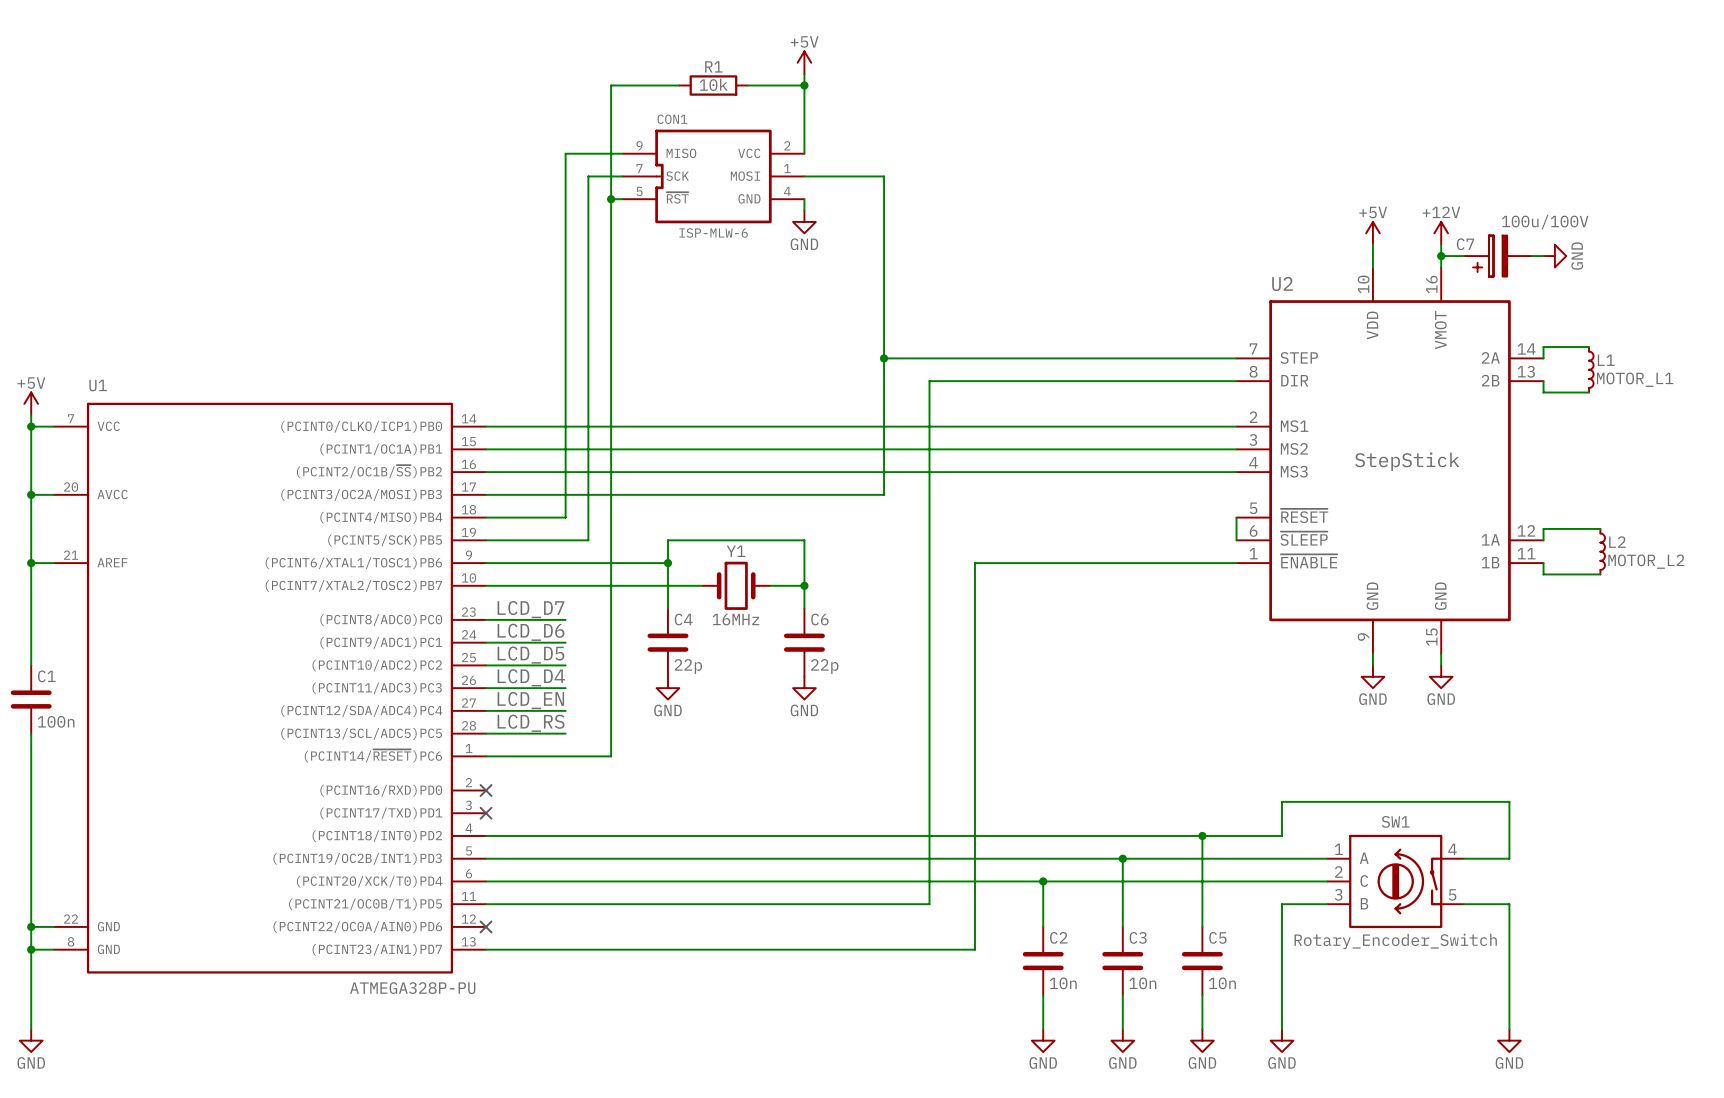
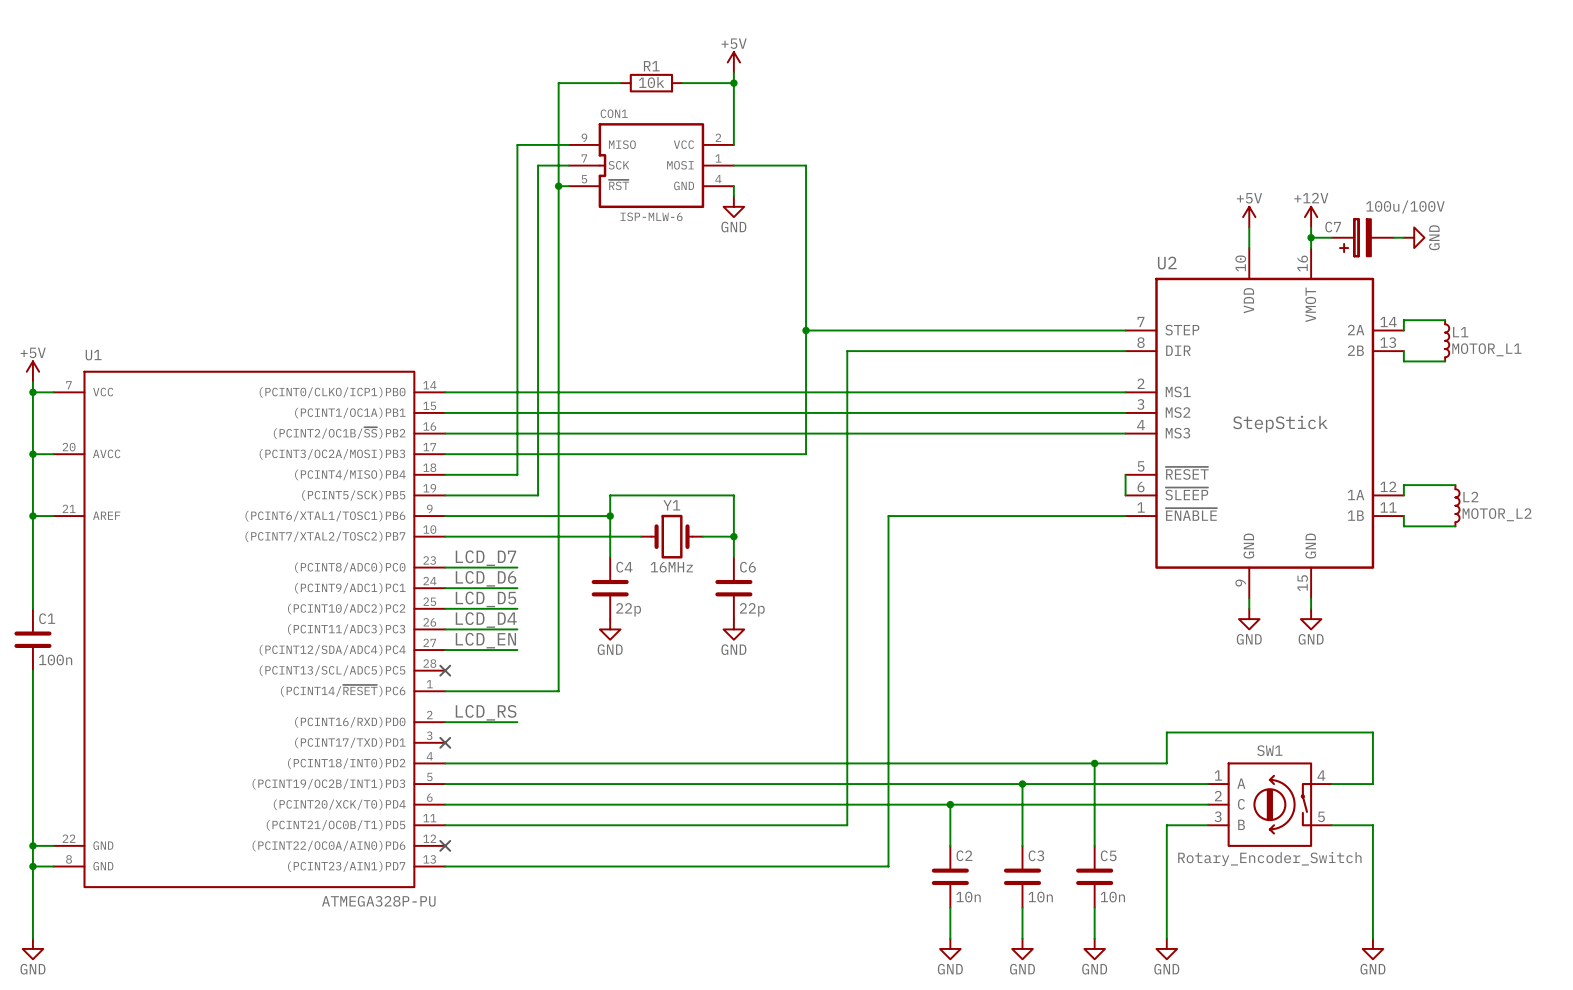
label position: LCD_RS (531, 723) -> LCD_RS (486, 712)
wire: (486, 733) (565, 733) -> (445, 722) (517, 722)
no-connect mark: none -> (445, 670)
no-connect mark: (486, 790) -> none

